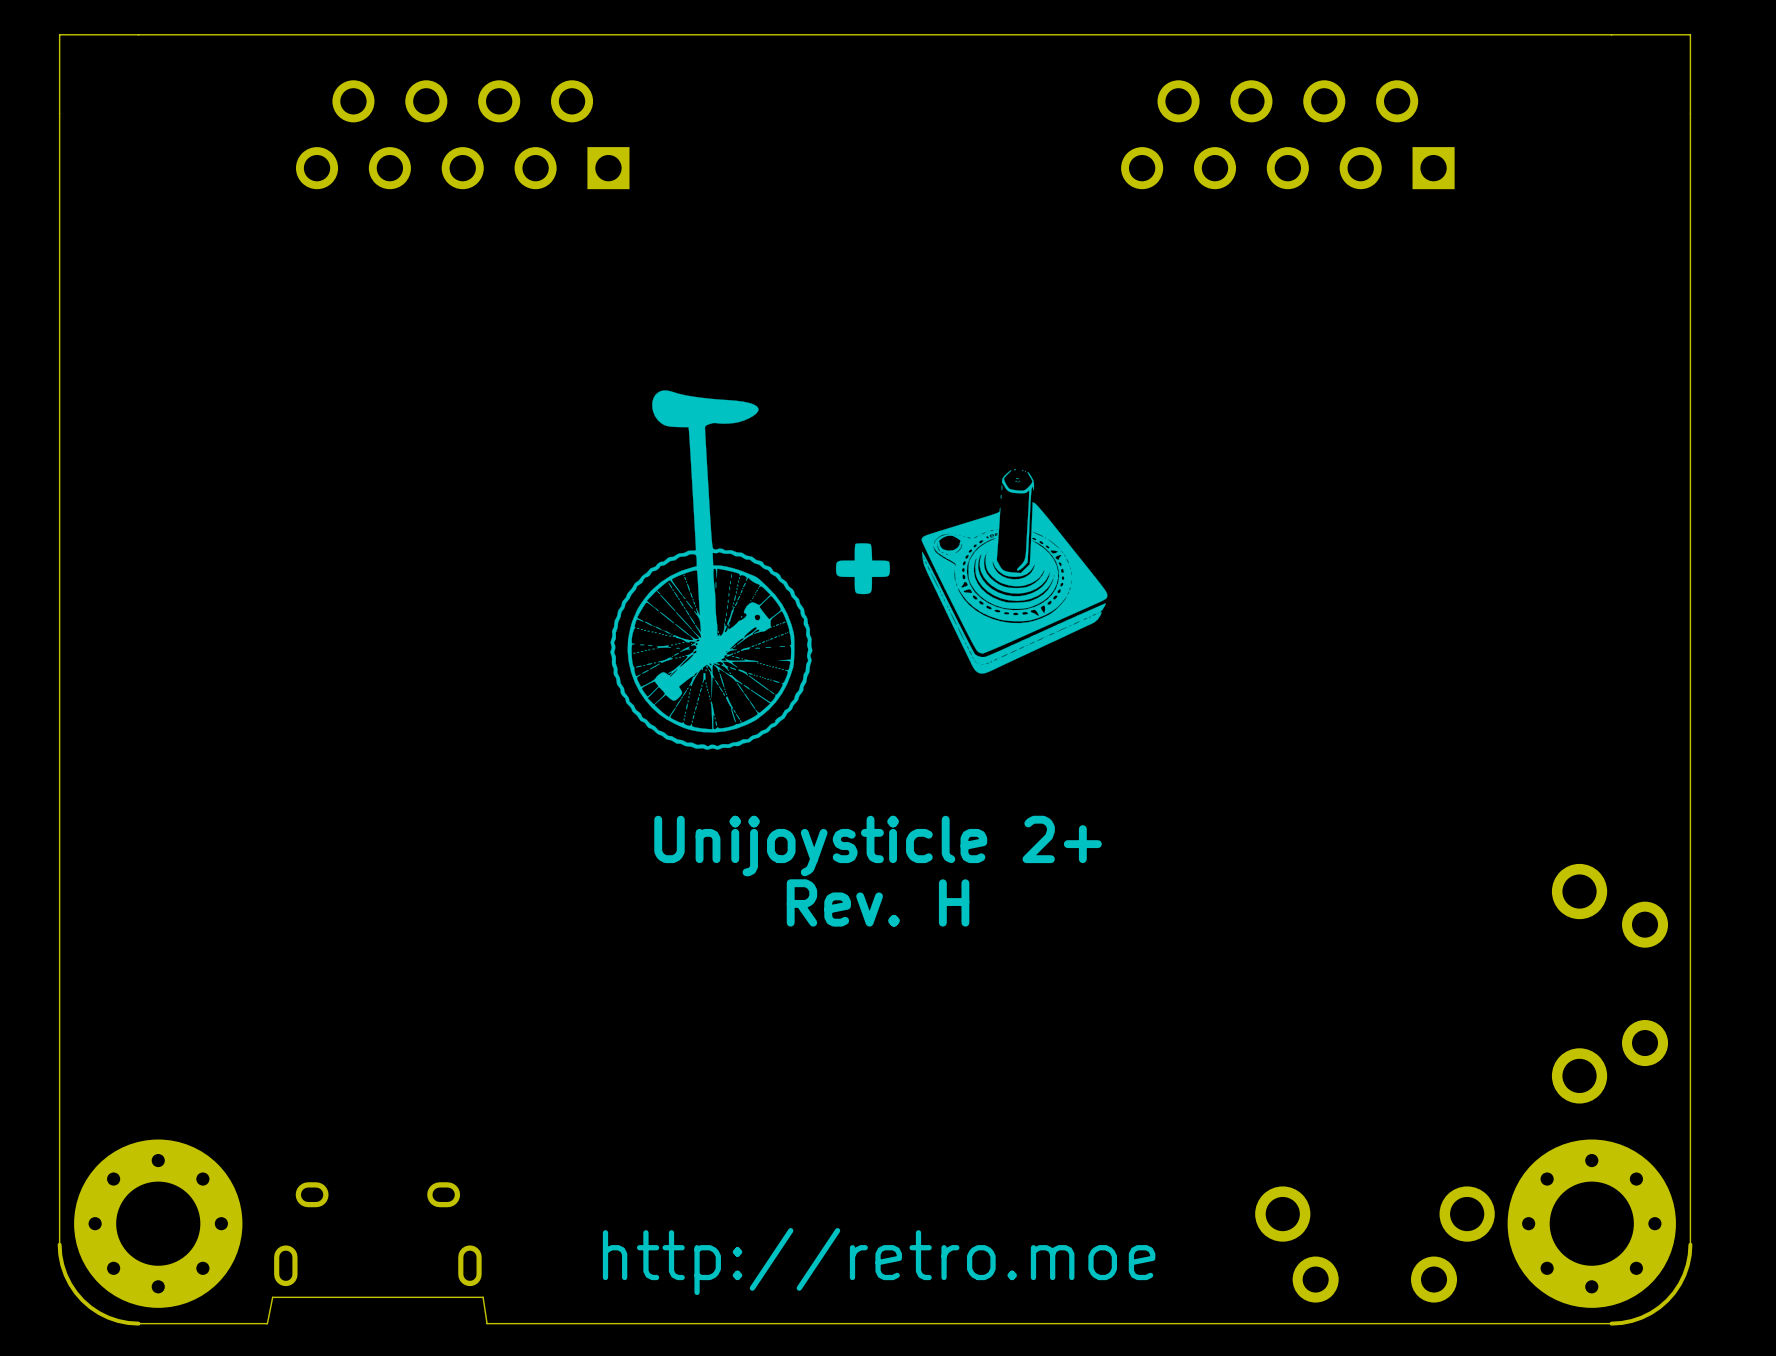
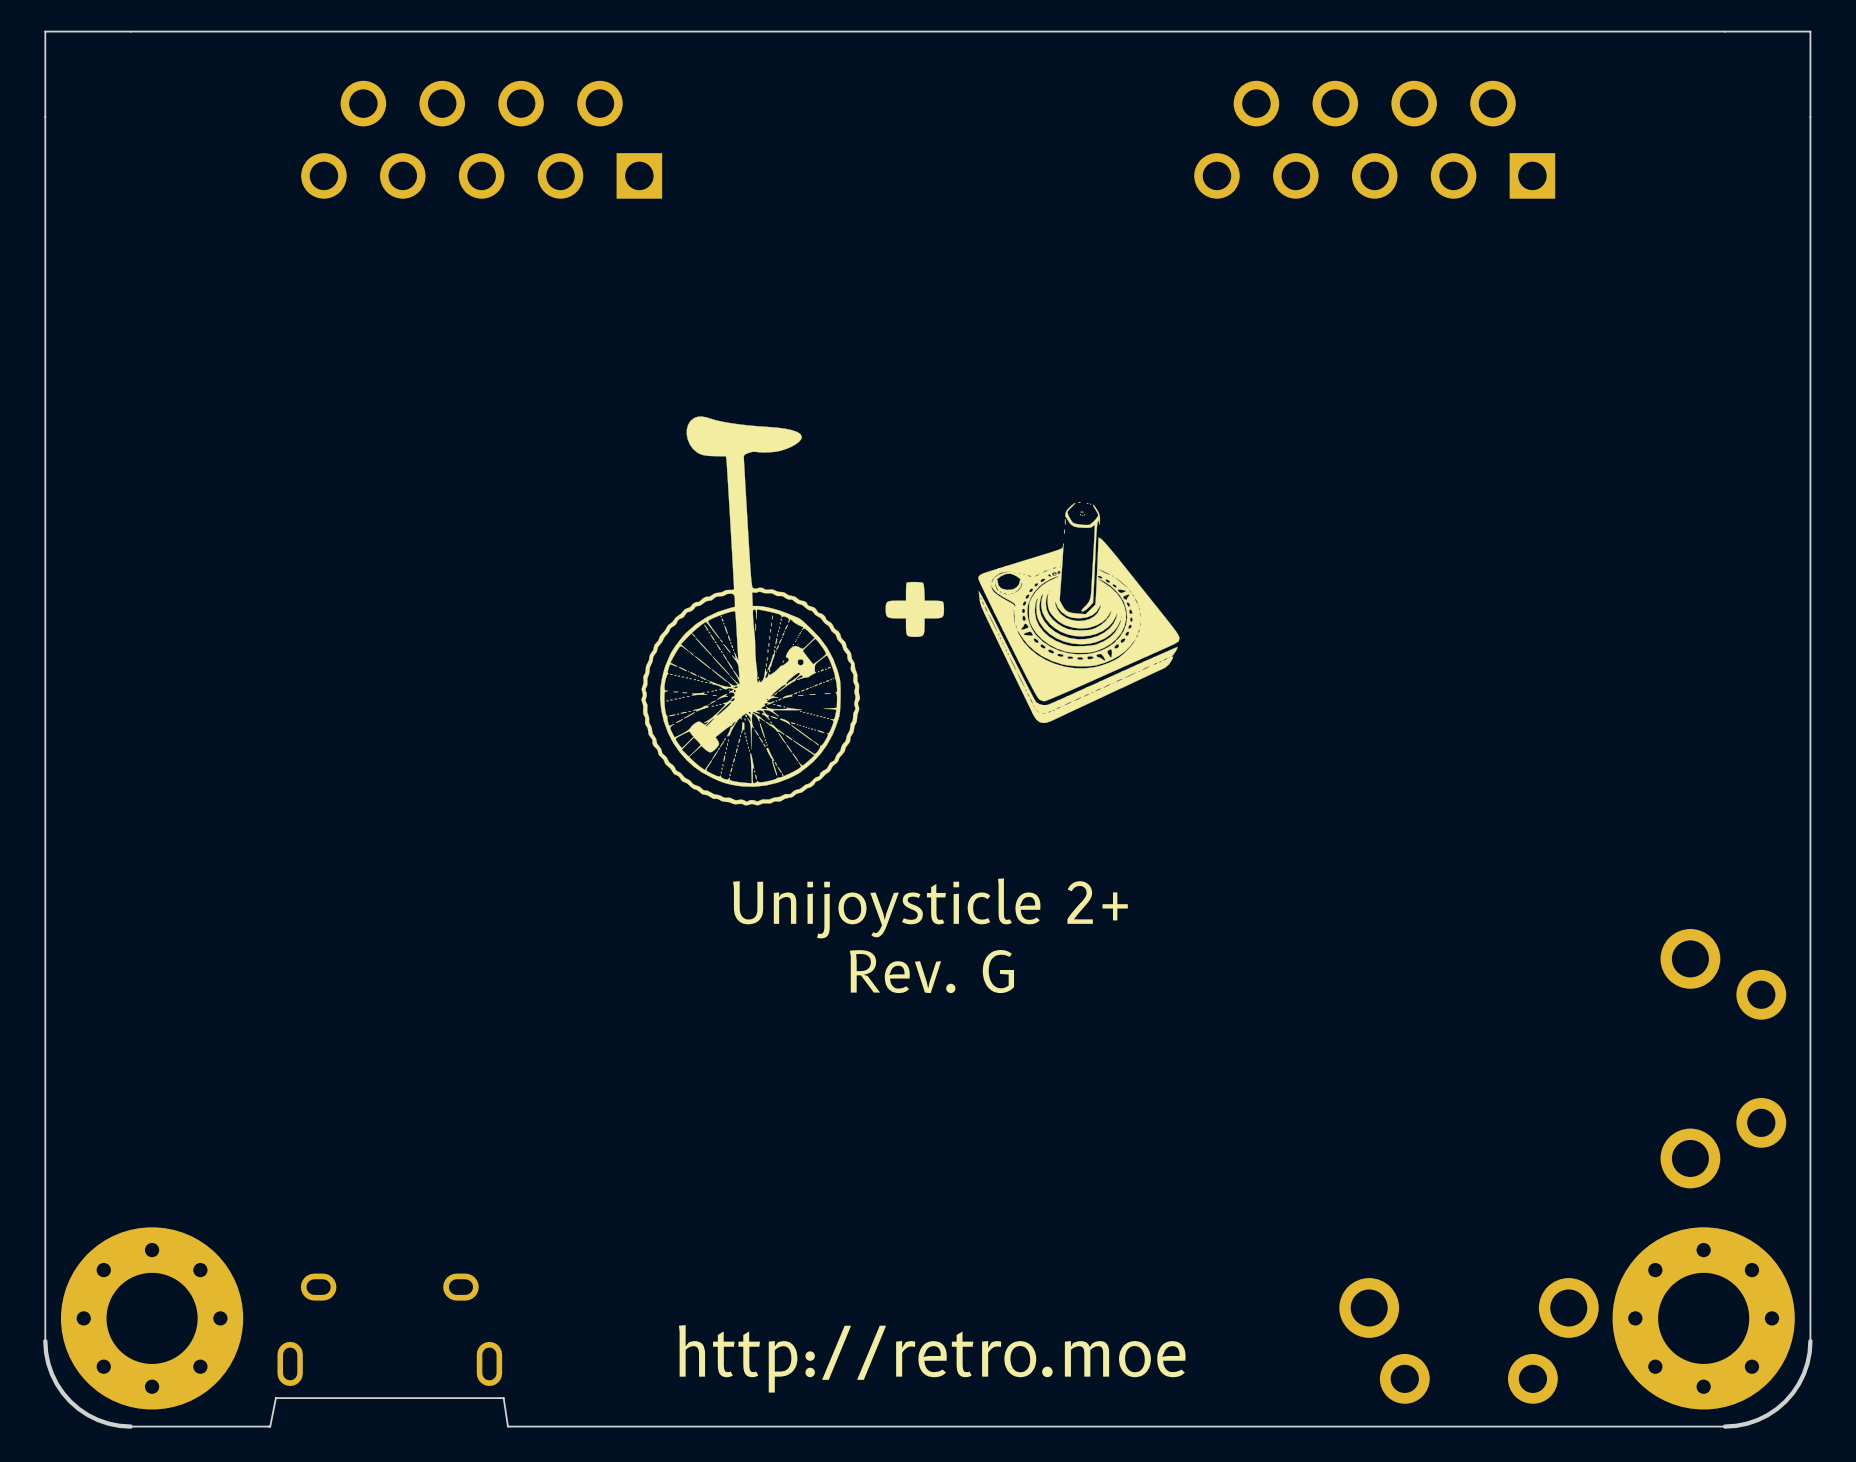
text: Rev. H (878, 902) -> Rev. G (931, 971)

